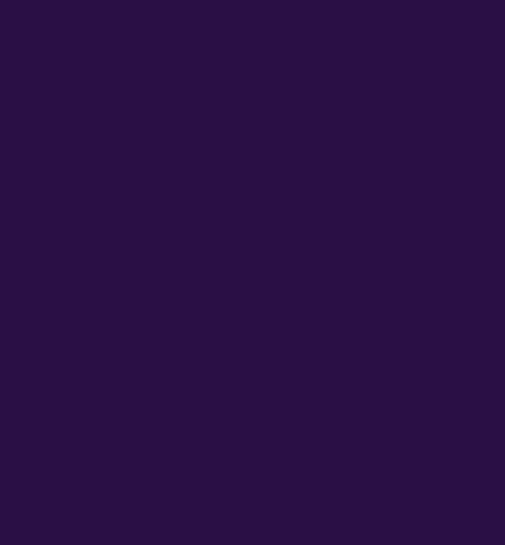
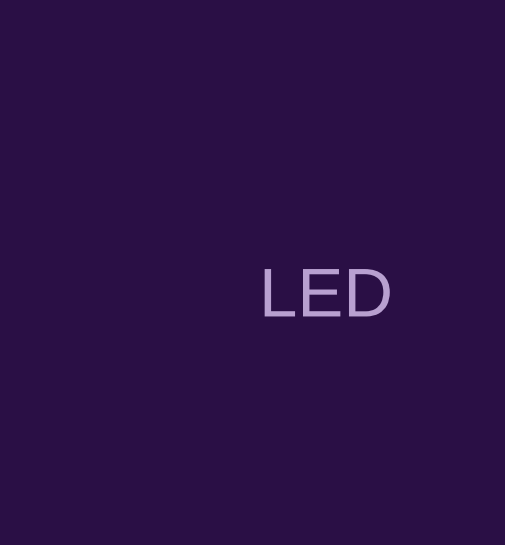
text: none -> LED (327, 292)

